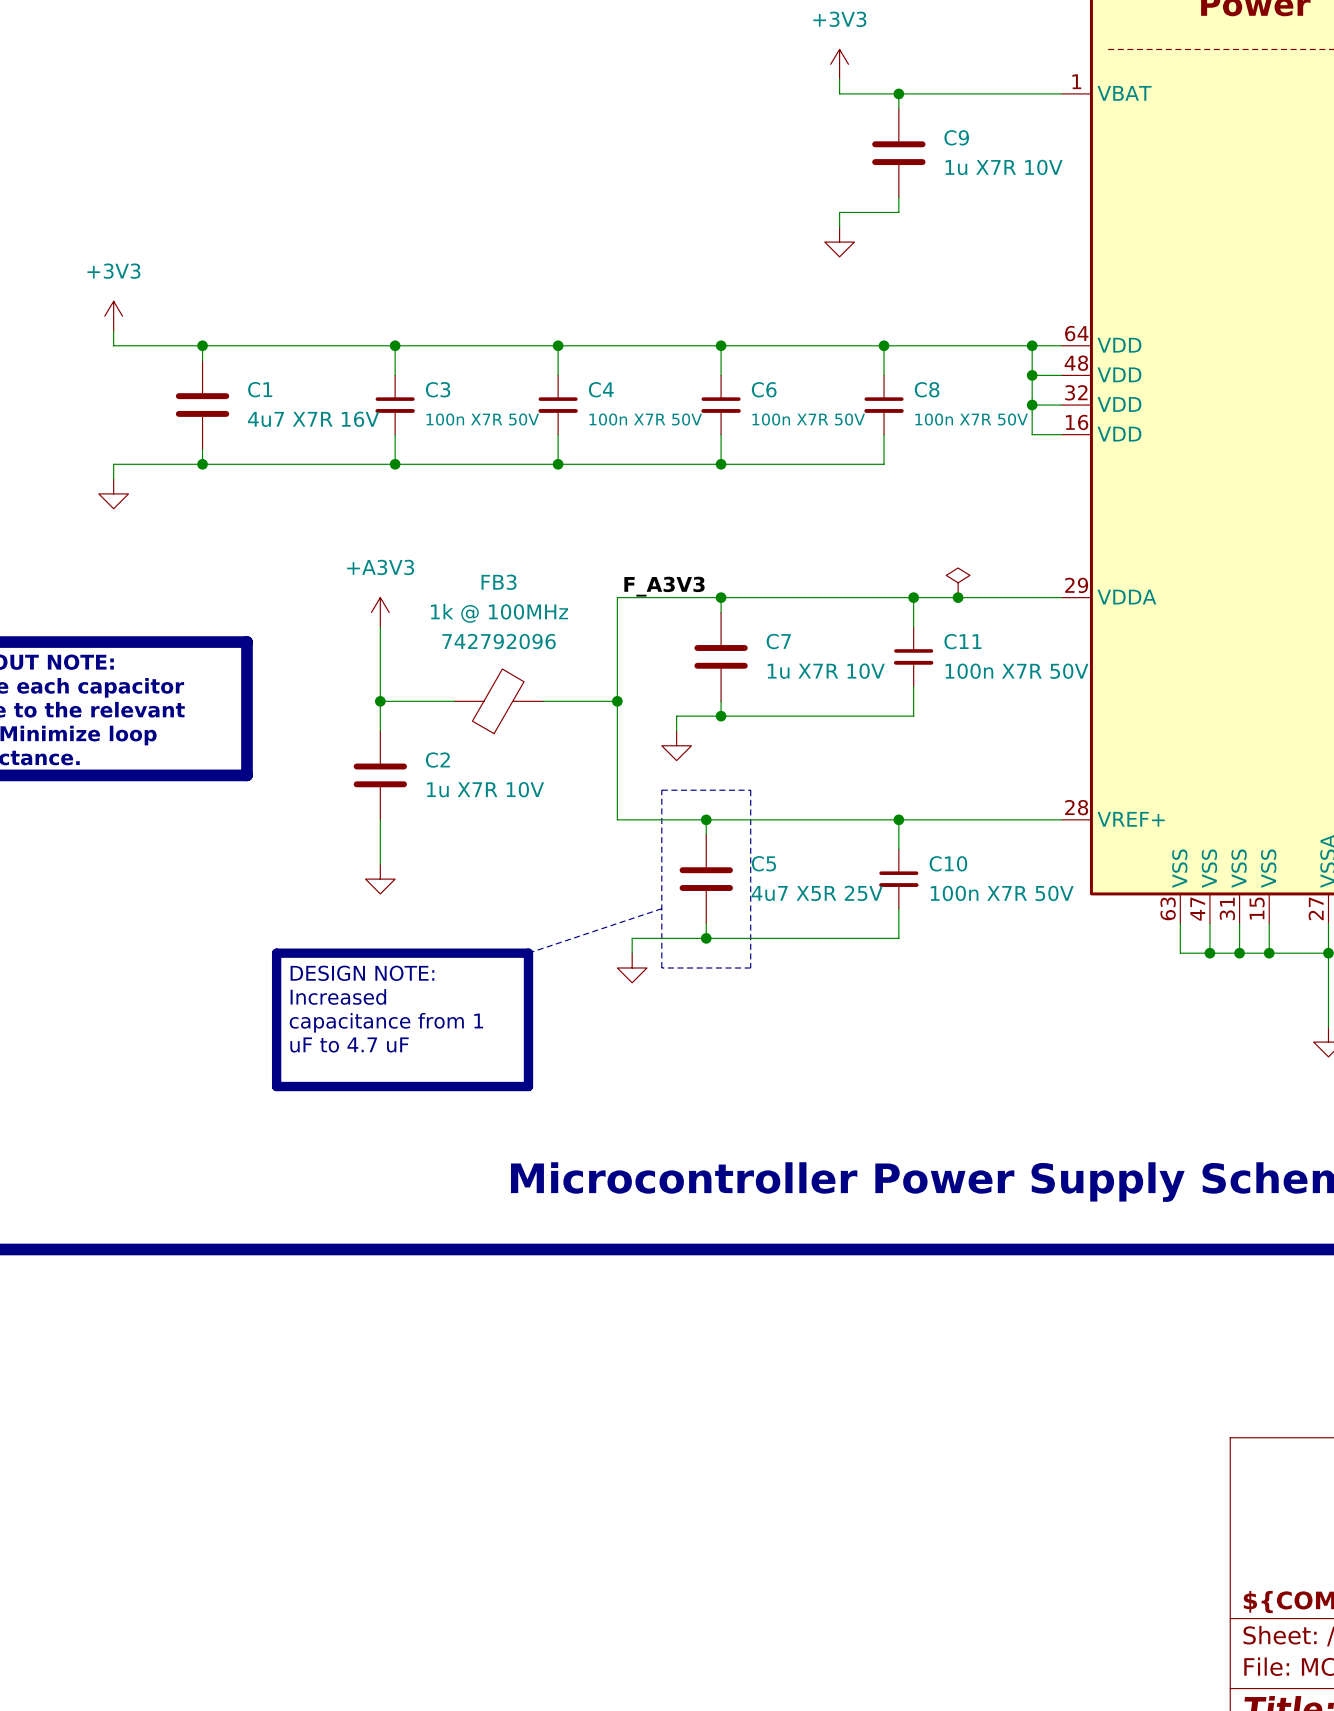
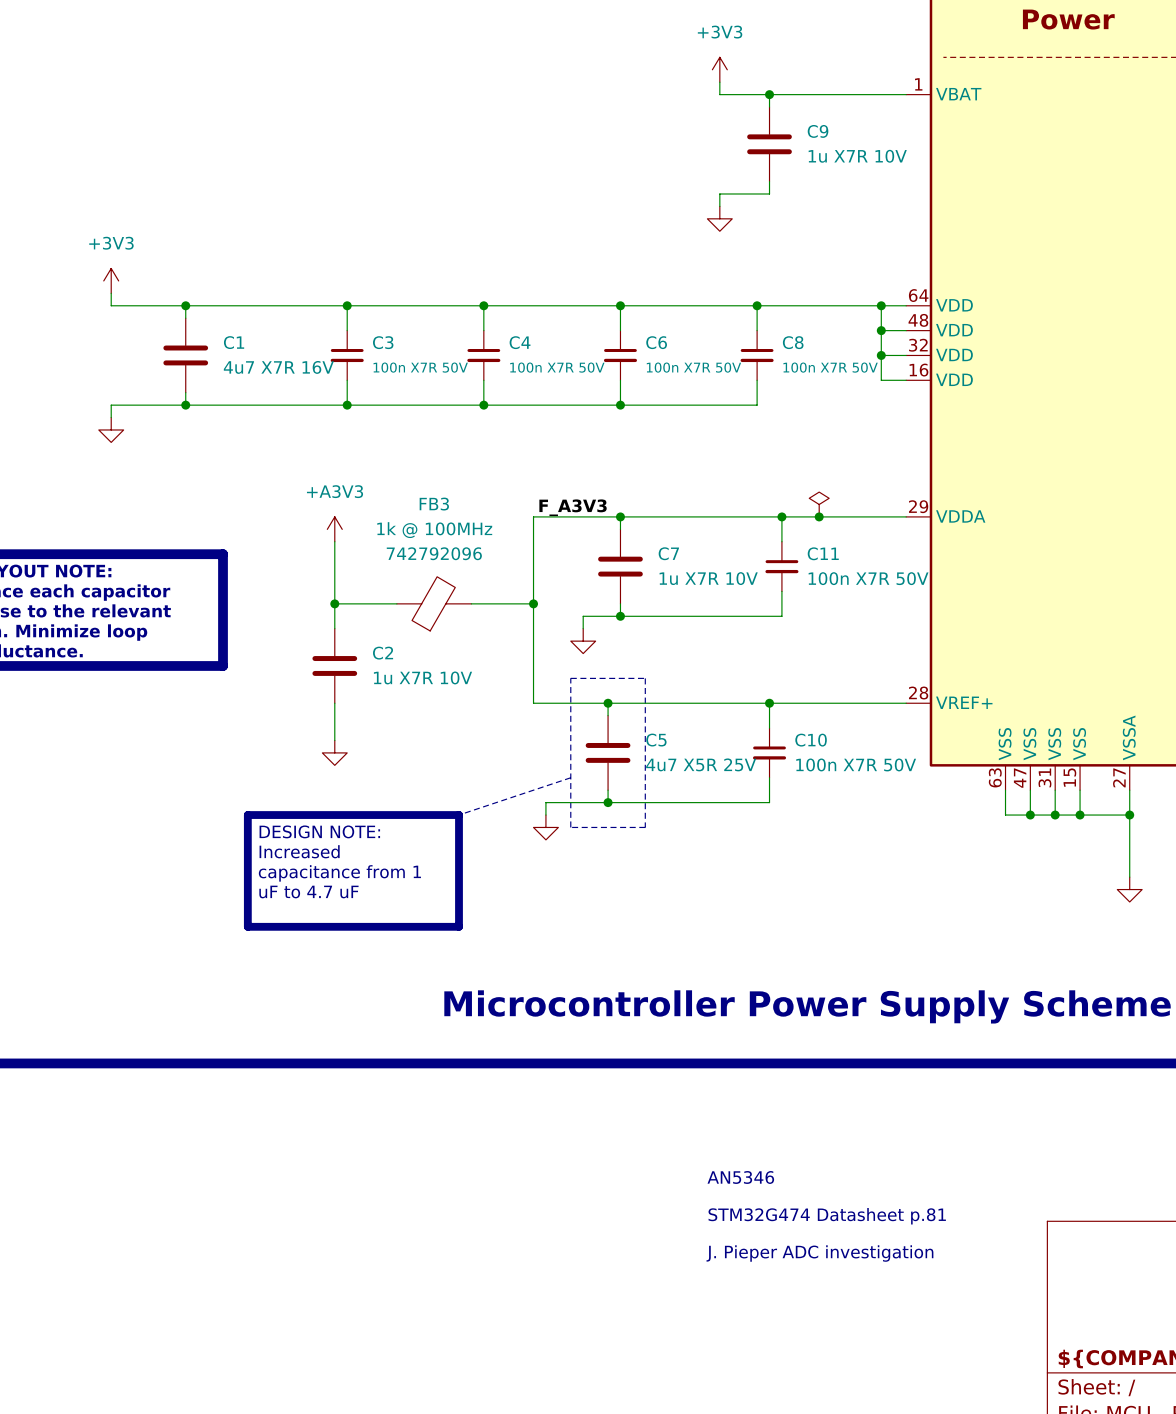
text: none -> AN5346 (740, 1177)
text: none -> STM32G474 Datasheet p.81 (827, 1216)
text: none -> J. Pieper ADC investigation (819, 1253)

